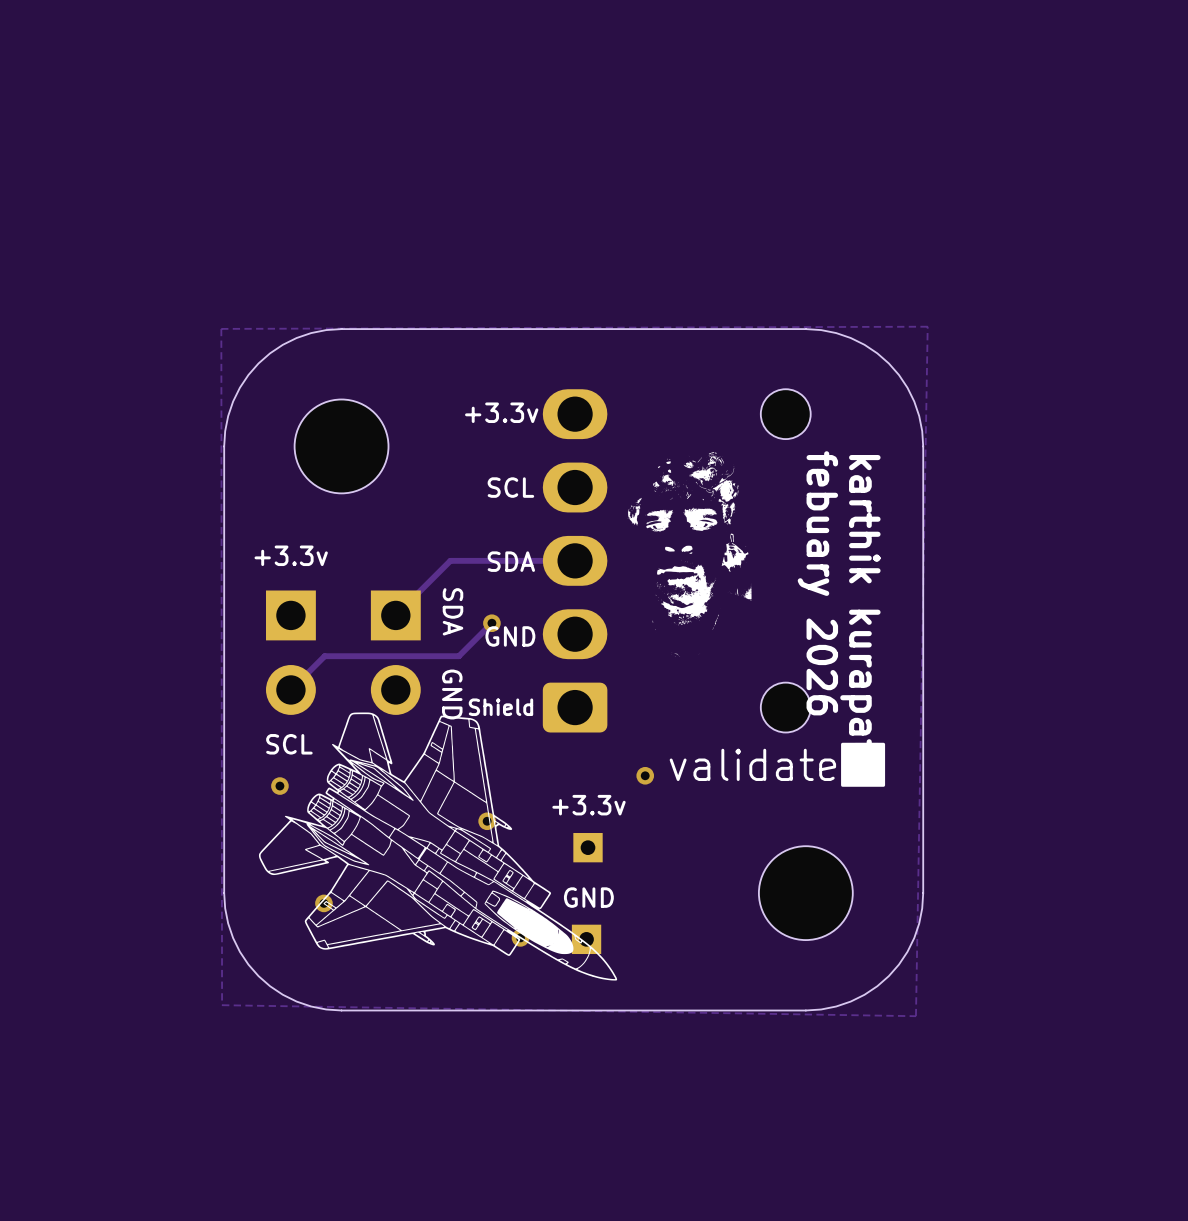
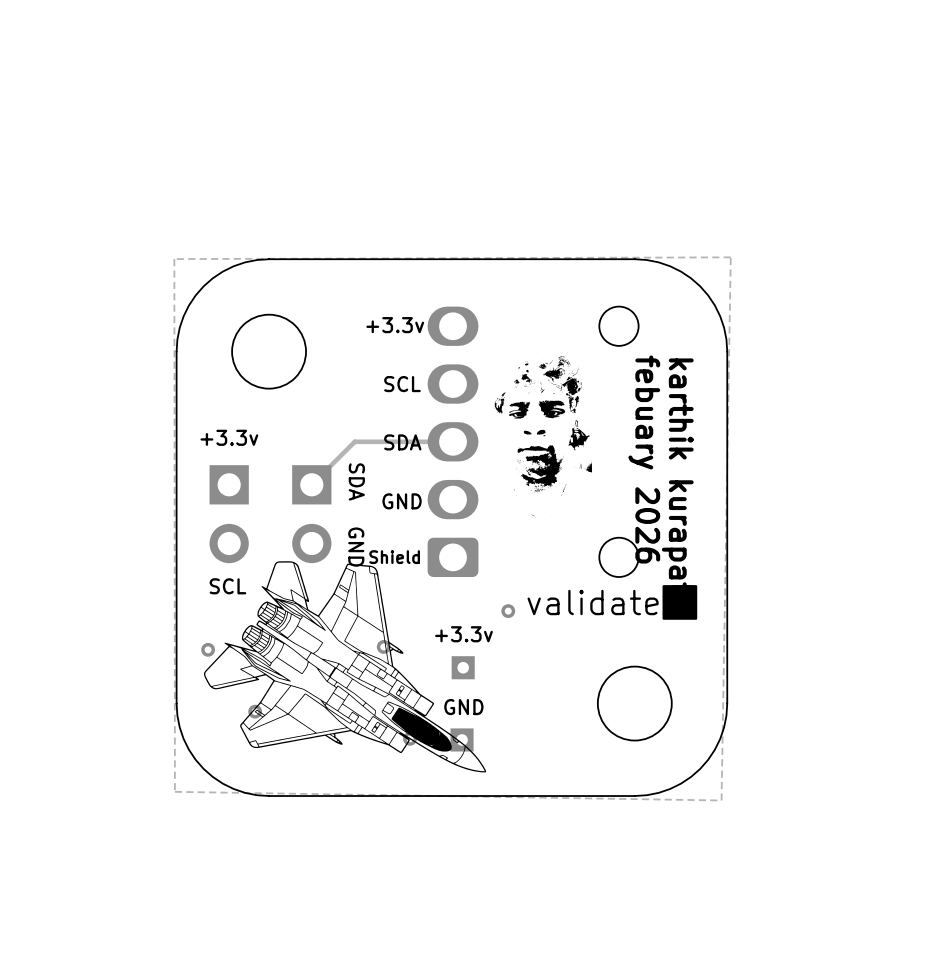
track: (491, 623) (458, 656) (324, 656) (290, 689) -> none
via: (491, 623) -> none
via position: (279, 786) -> (208, 649)

